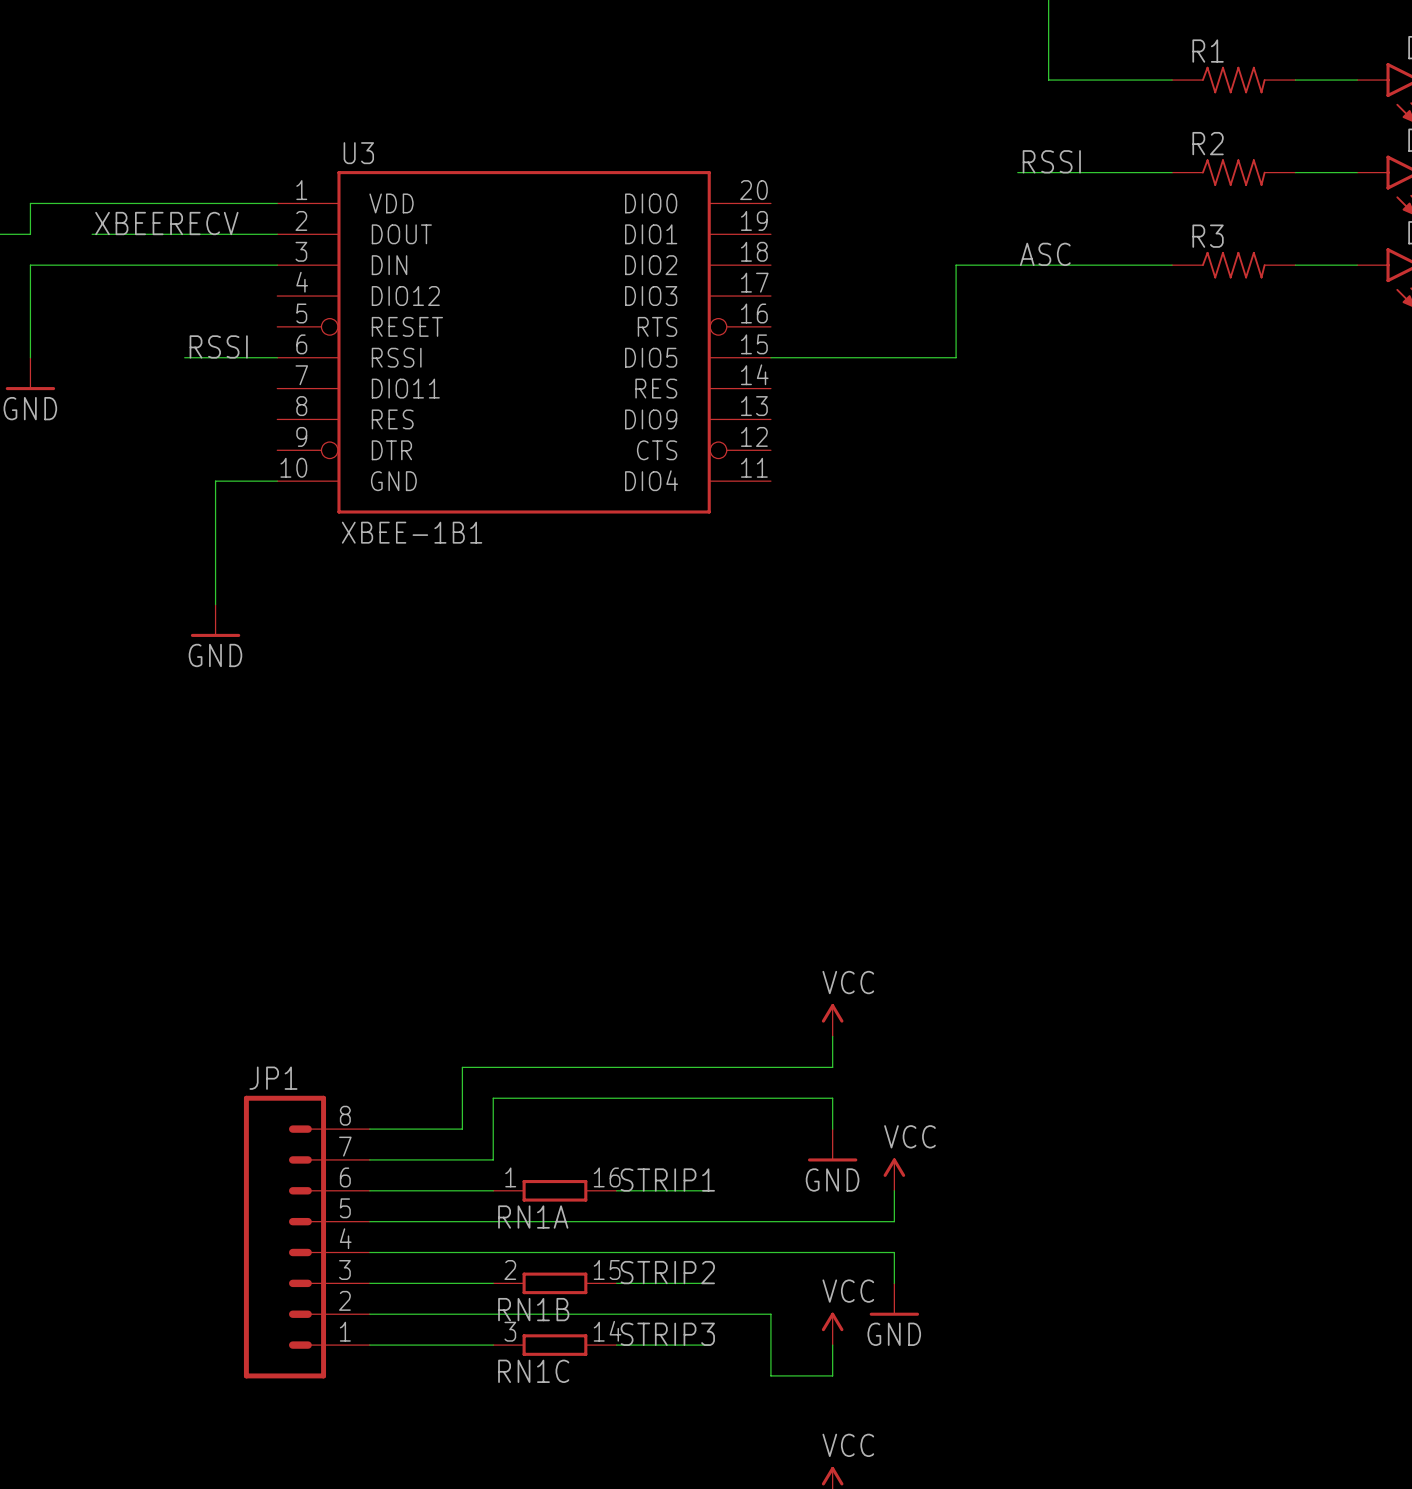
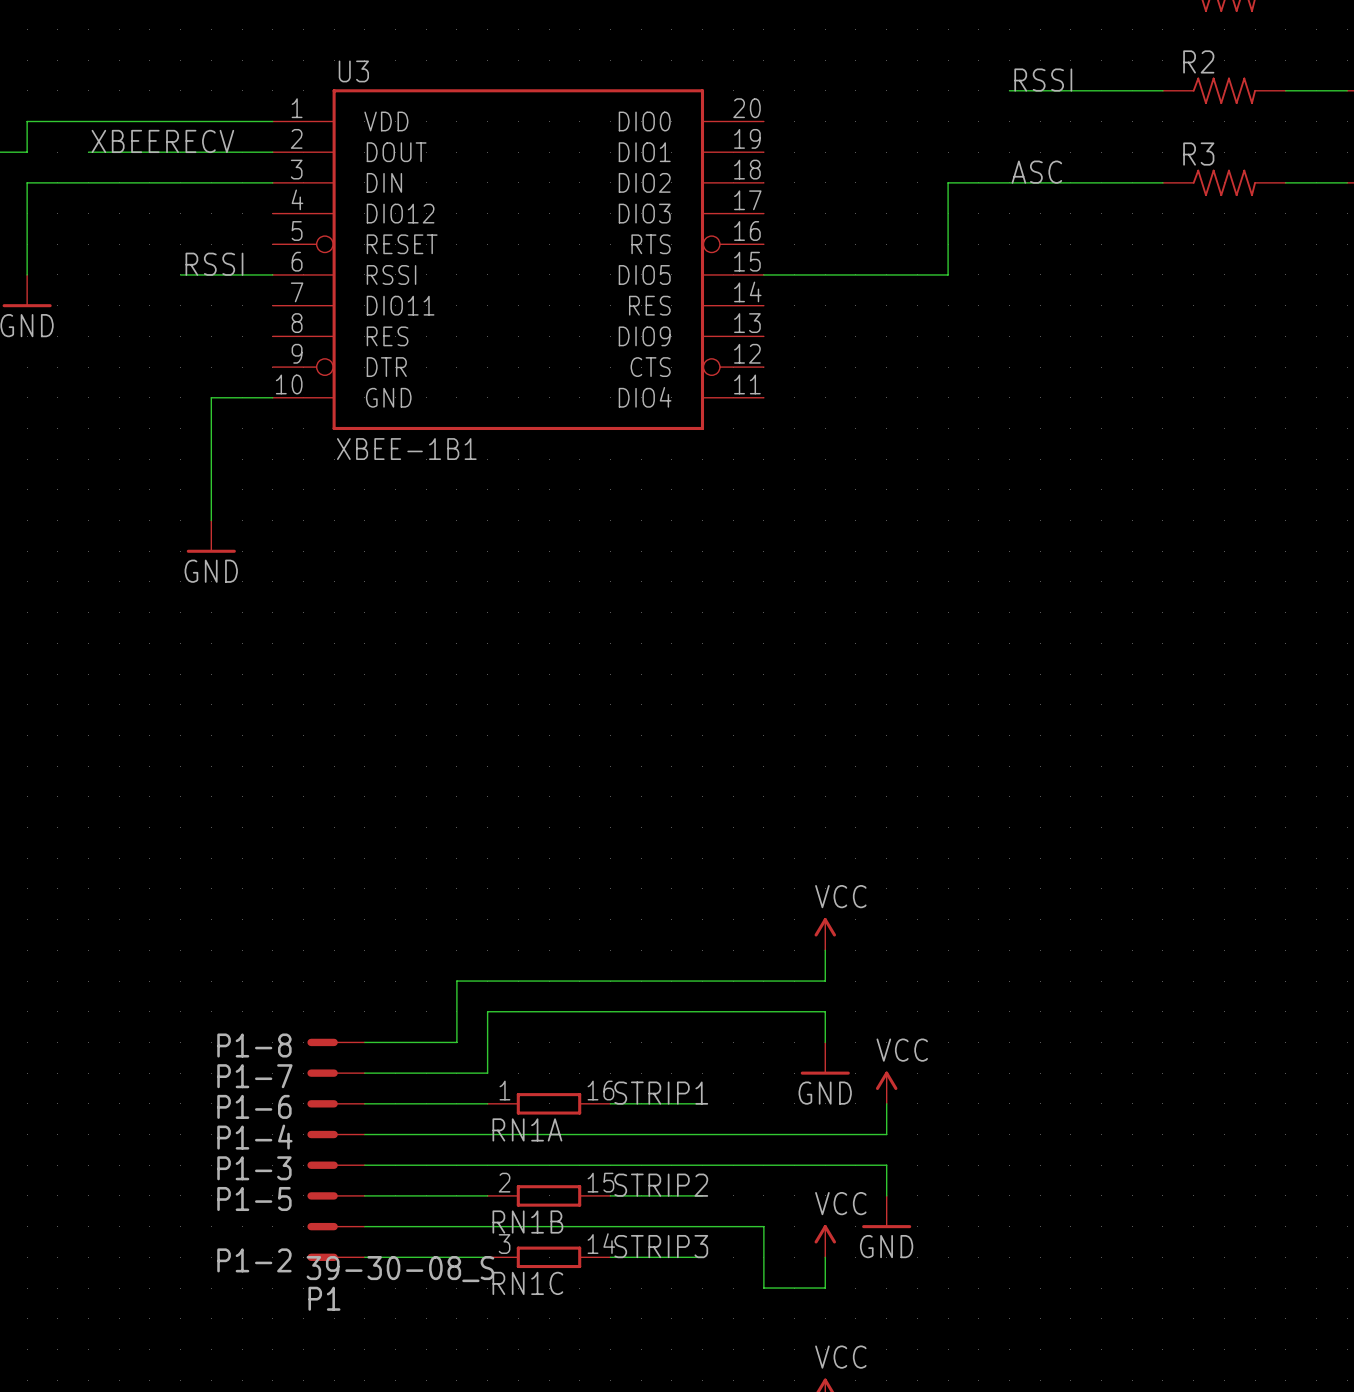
P1-8: none -> (336, 1042)
P1-7: none -> (336, 1073)
P1-6: none -> (336, 1103)
P1-4: none -> (336, 1134)
JP1: (306, 1237) -> none
P1-3: none -> (336, 1165)
P1-5: none -> (336, 1195)
P1: none -> 39-30-08_S (336, 1226)
P1-2: none -> (336, 1257)

